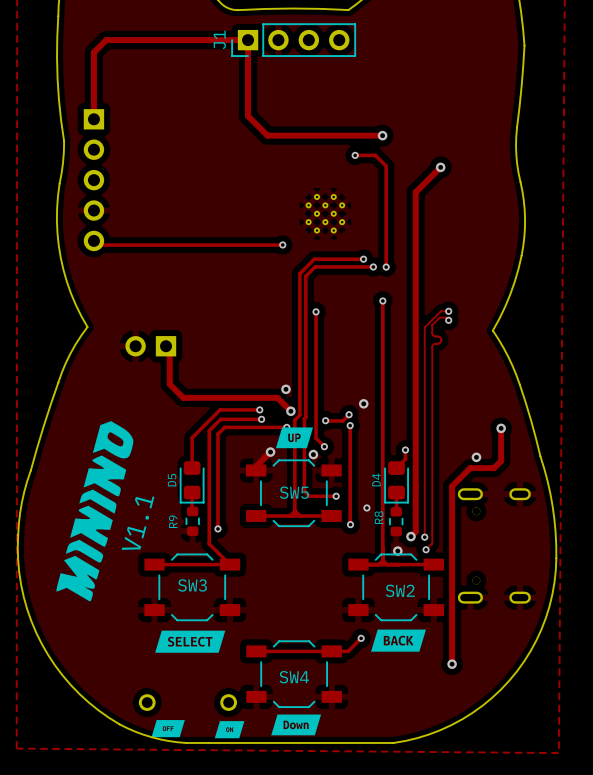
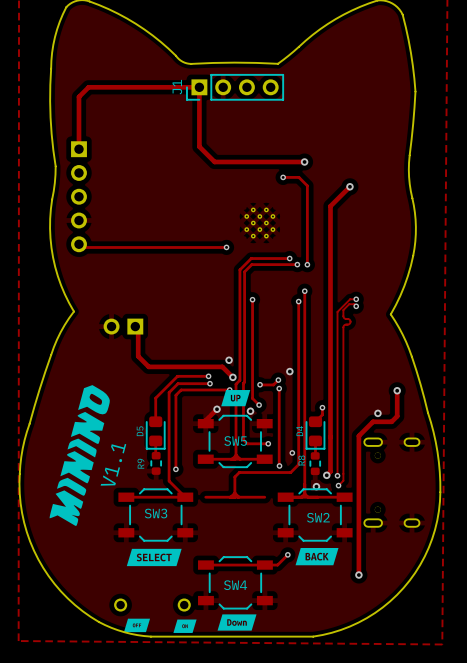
track: none -> (298, 301) (298, 464) (290, 472) (239, 472) (234, 477) (234, 497)
via: none -> (298, 301)
track: none -> (205, 497) (264, 497)
track: none -> (230, 497) (234, 493) (238, 497)

